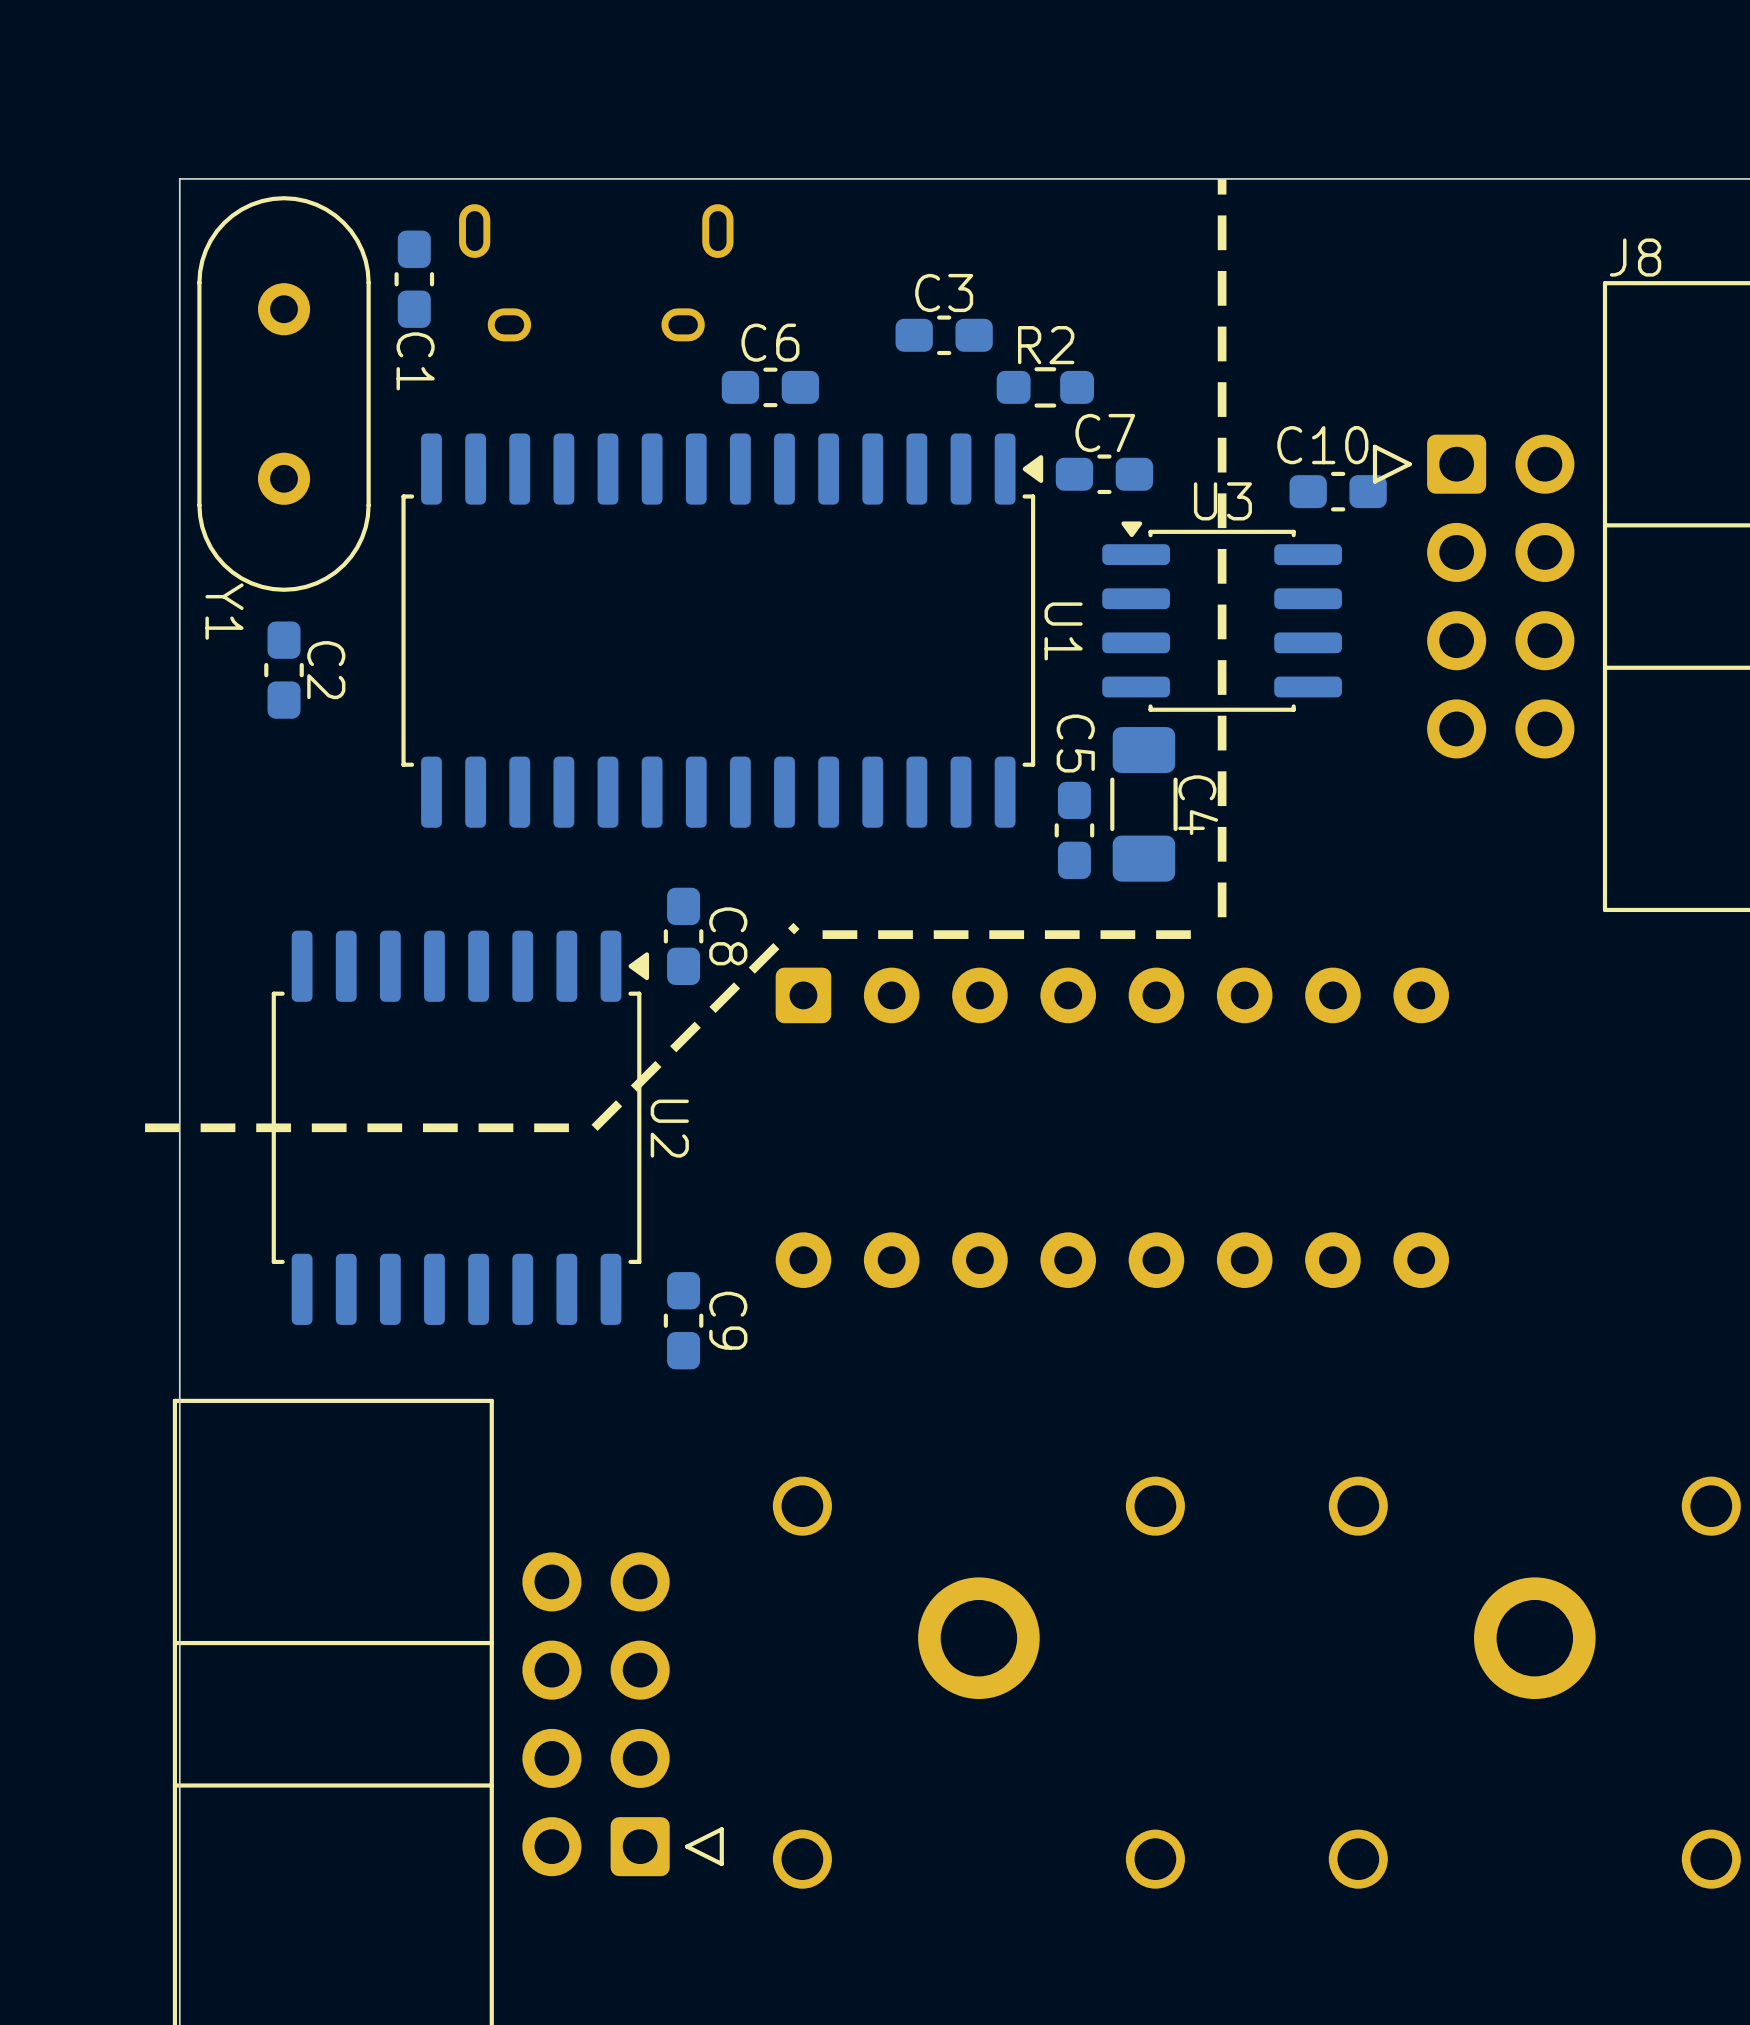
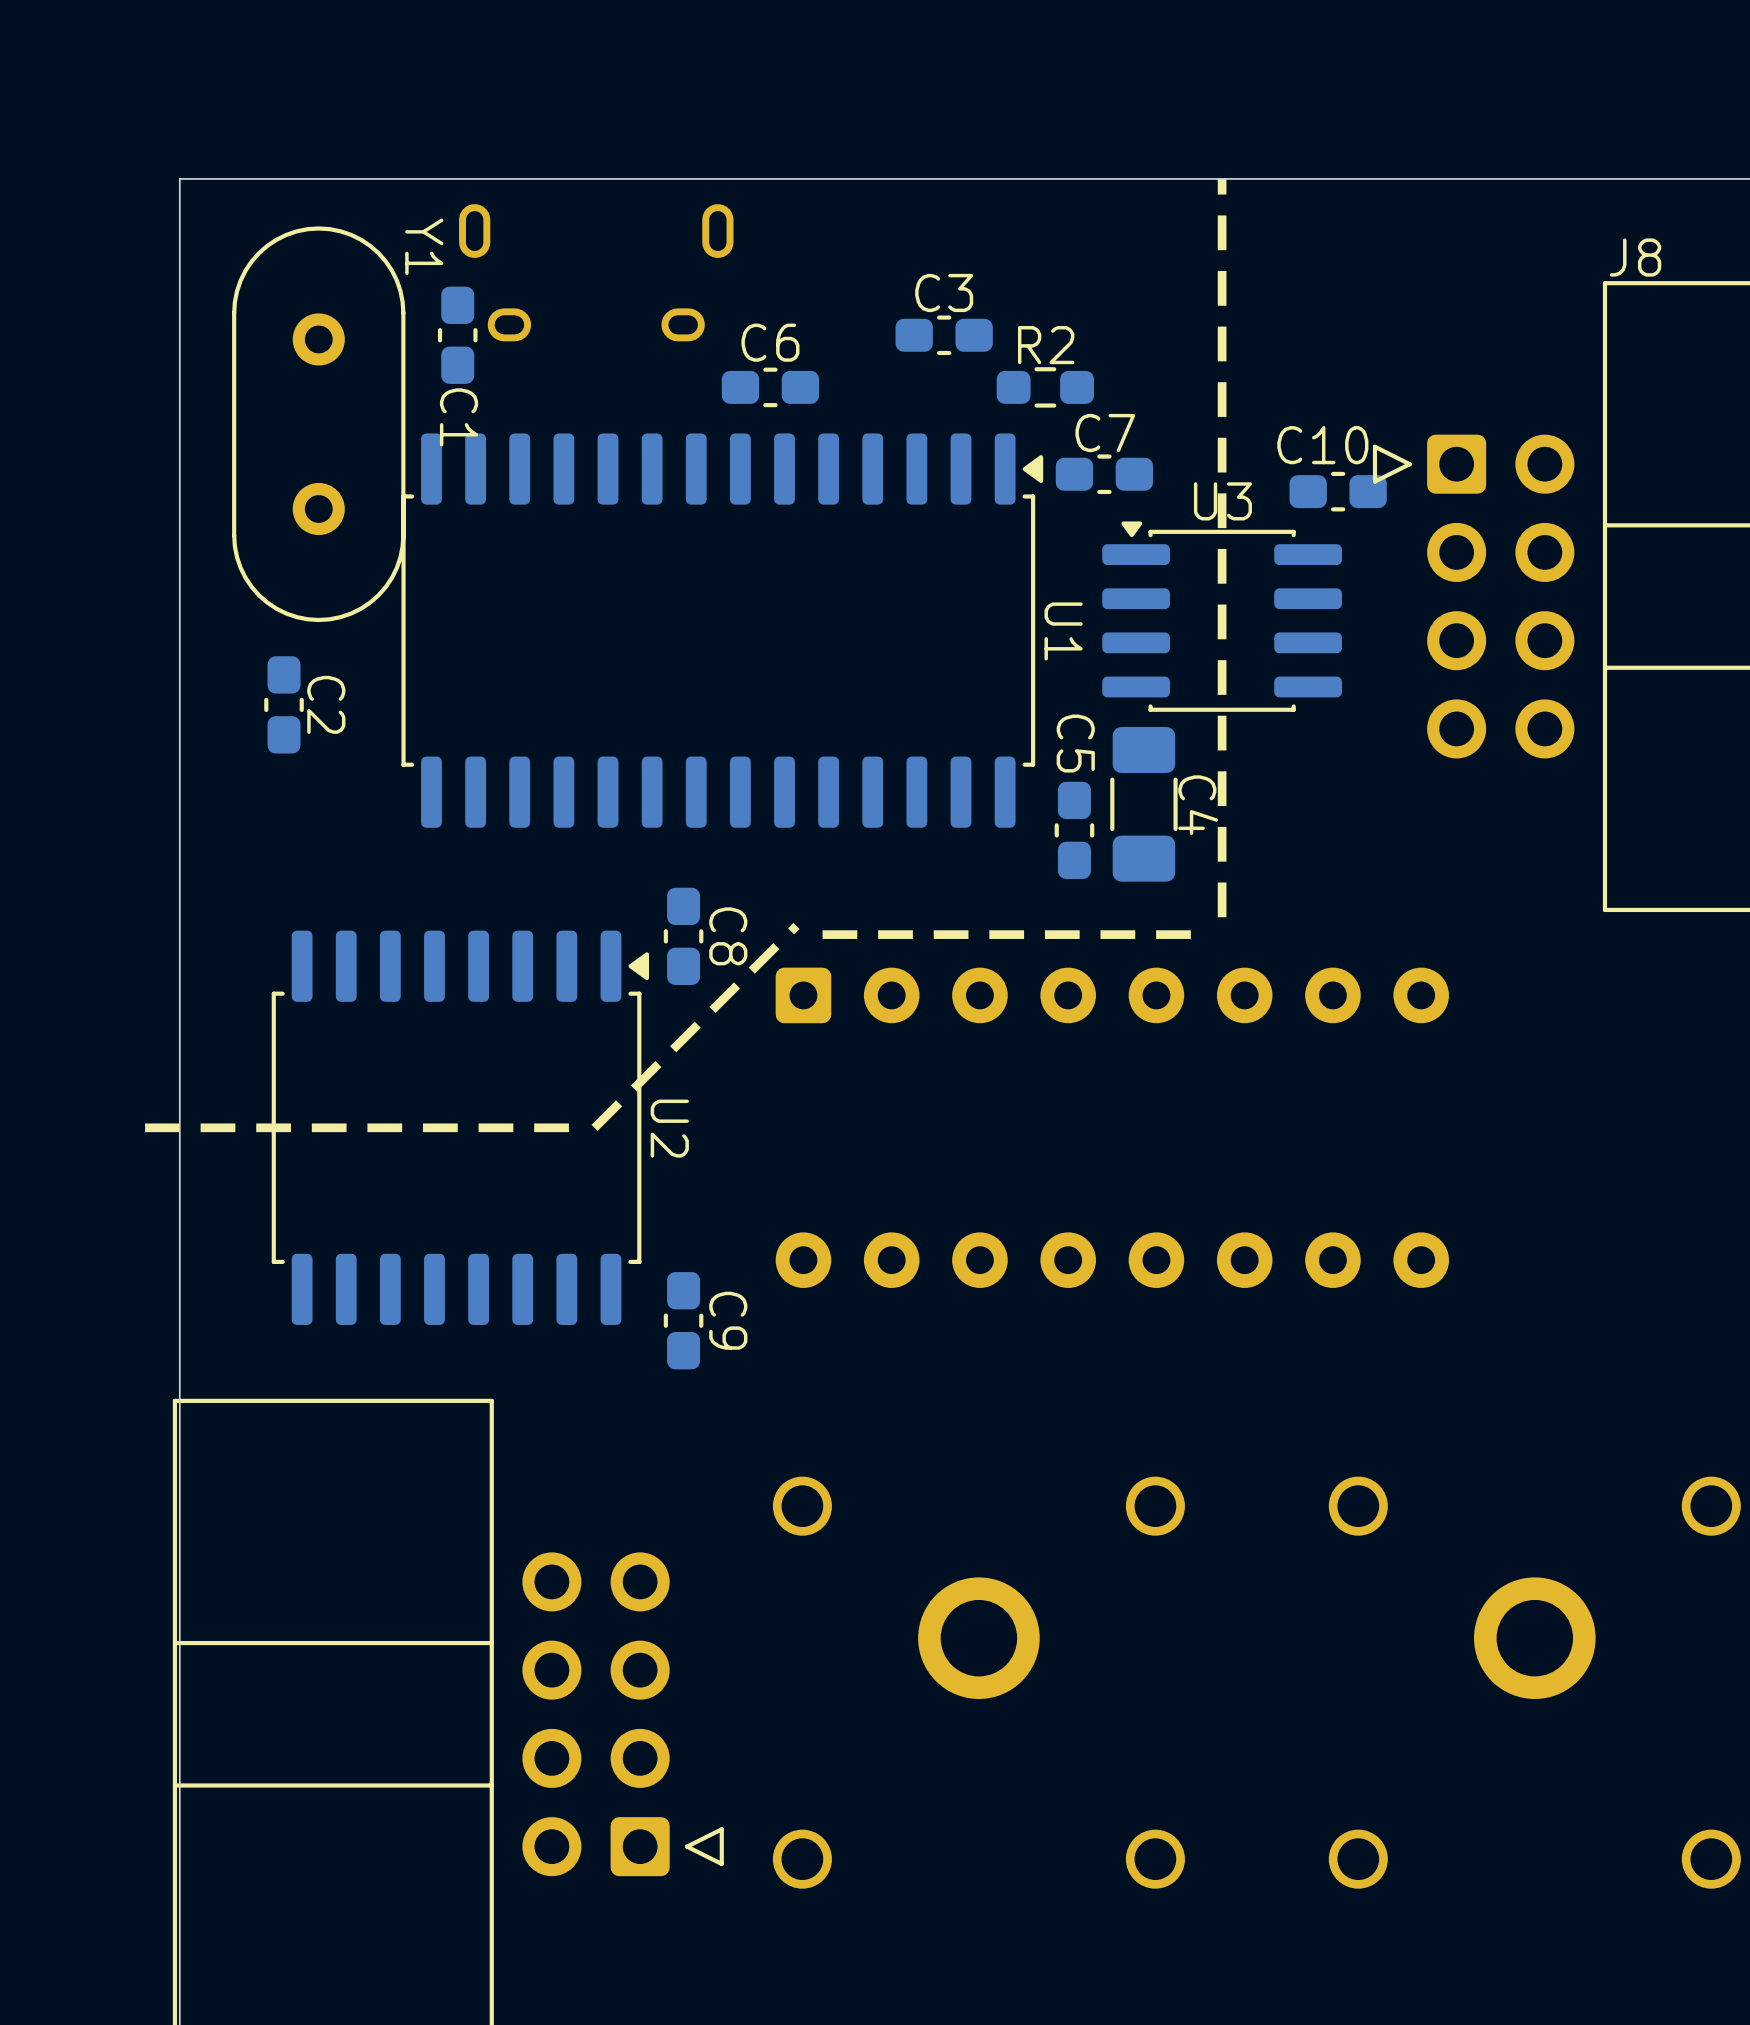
C1 position: (414, 279) -> (457, 335)
Y1 position: (284, 394) -> (318, 424)
Y1 name position: Y1 (224, 611) -> Y1 (424, 246)
C2 position: (284, 670) -> (284, 704)

